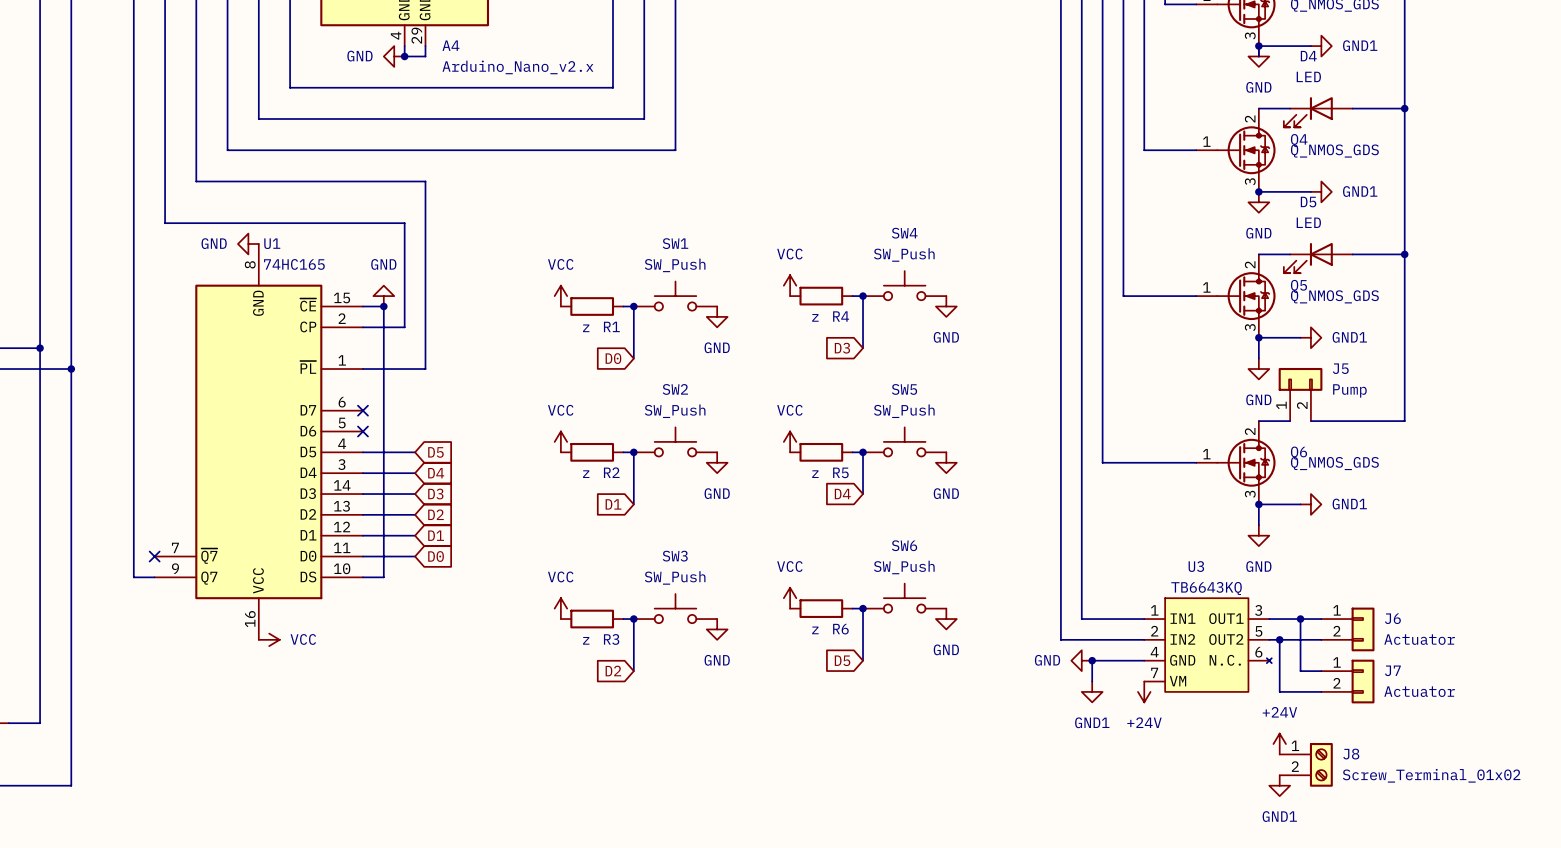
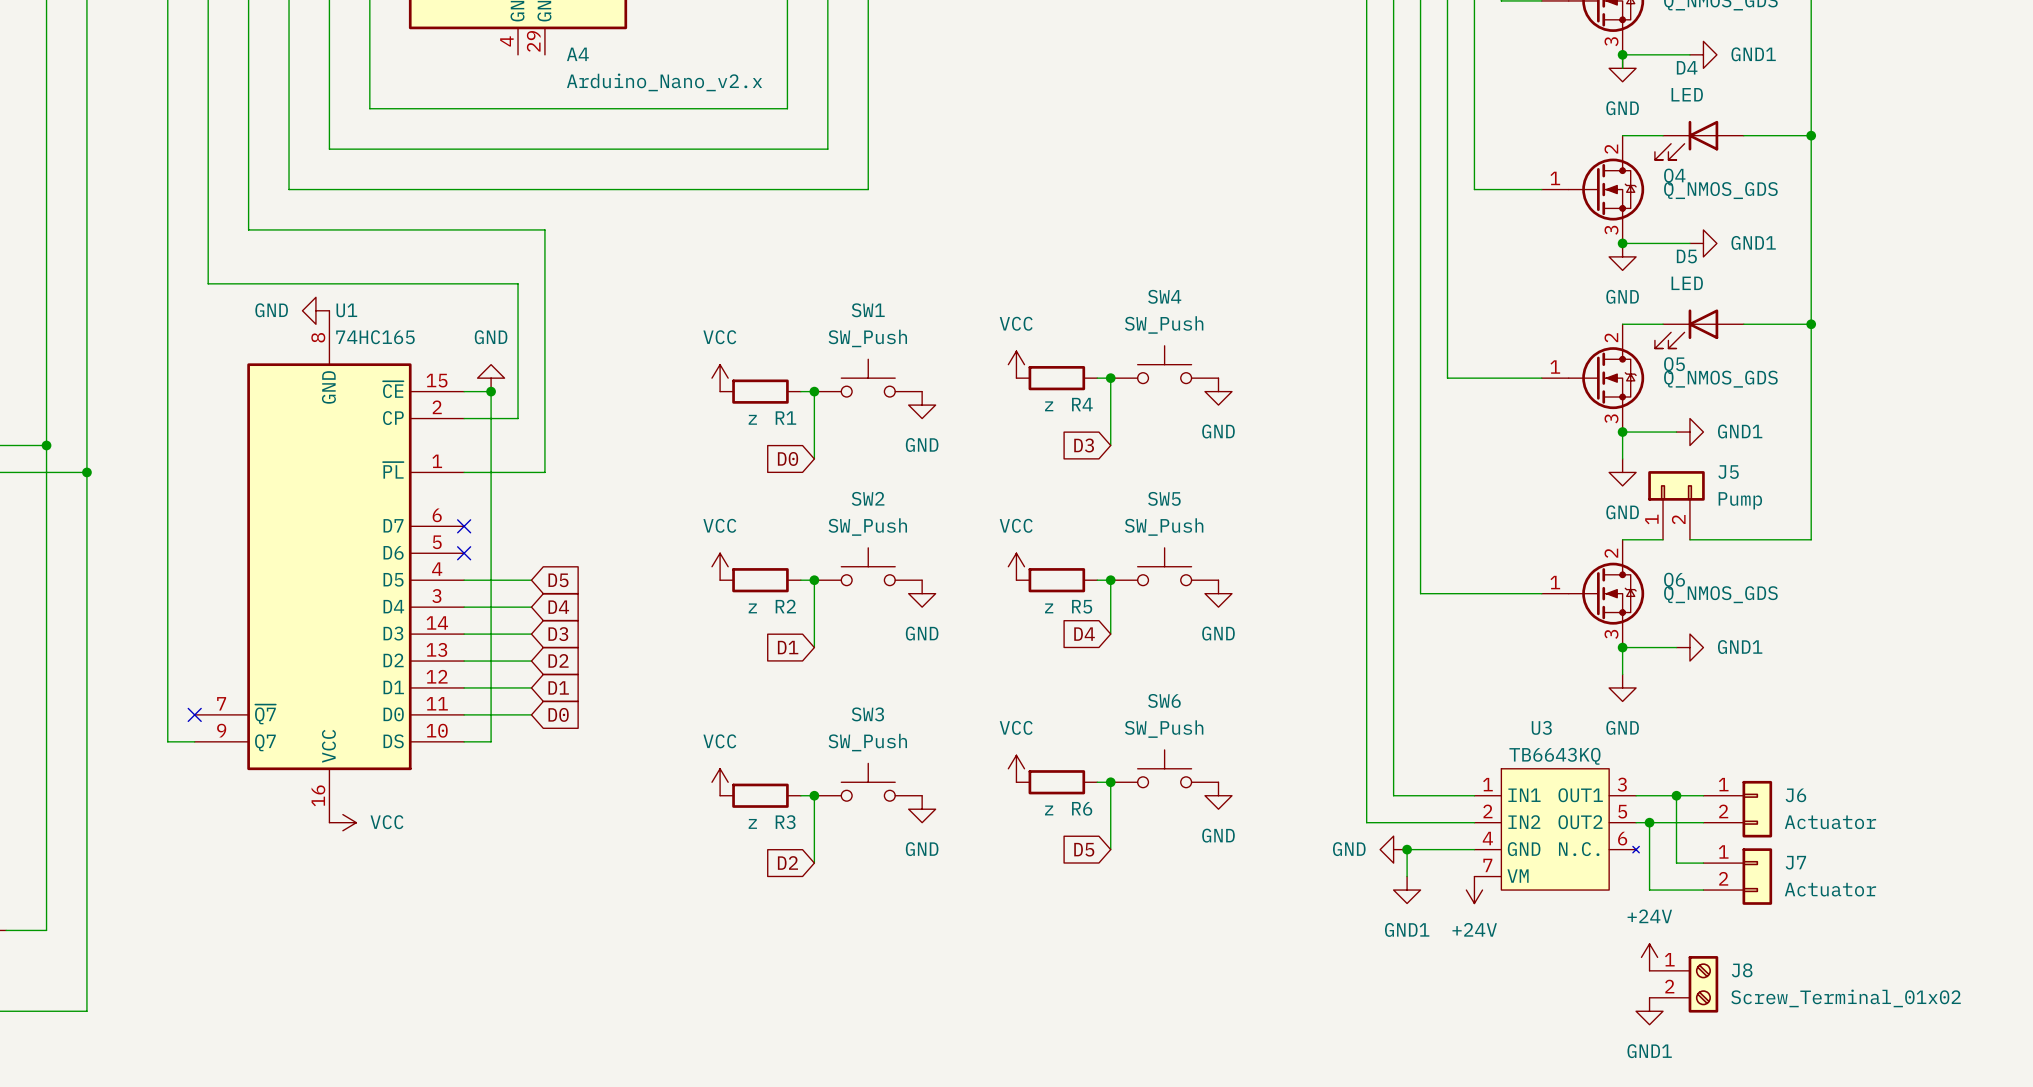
wire: (404, 46) (404, 56) (425, 56) (425, 46) -> none
power symbol: GND (394, 56) -> none
junction: (404, 56) -> none

